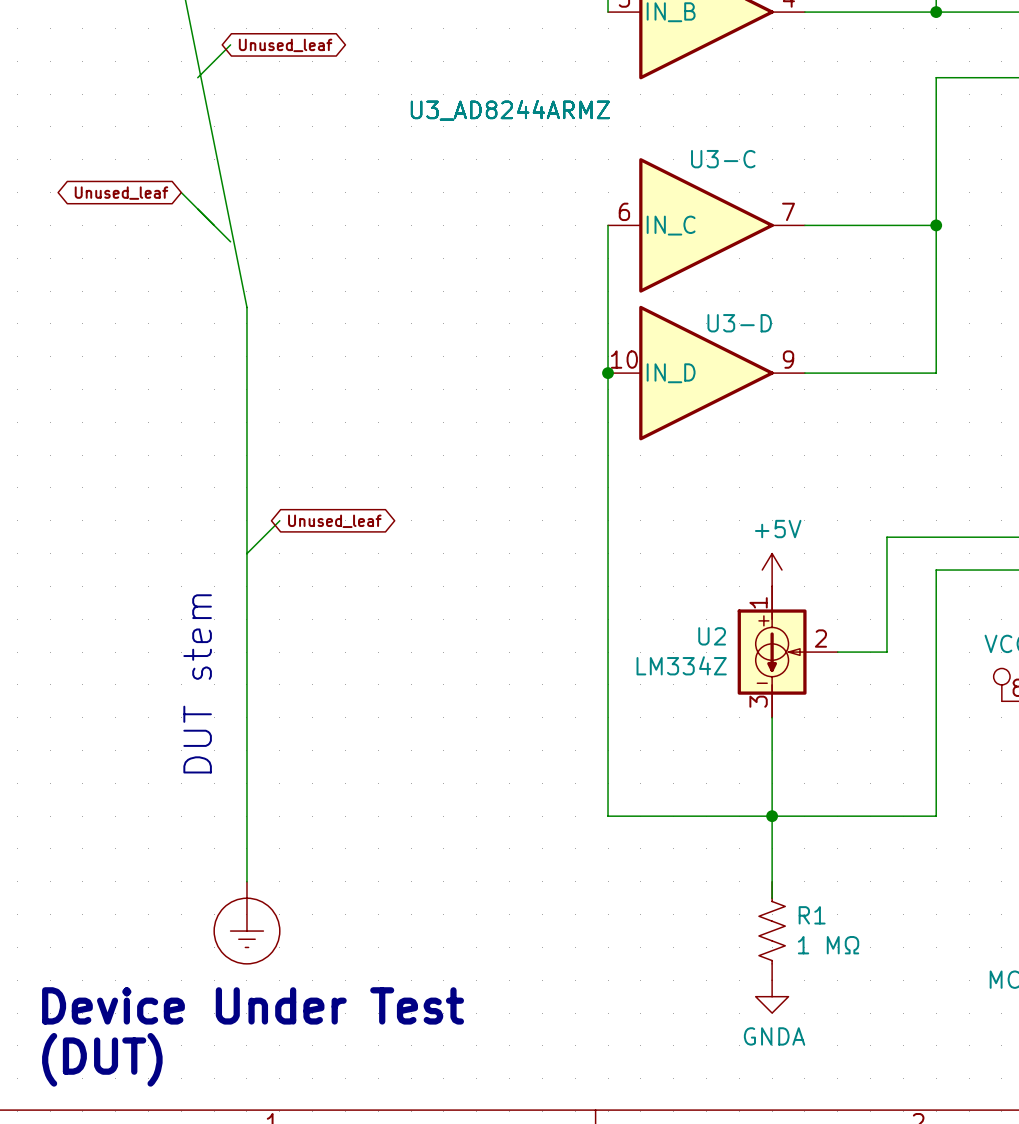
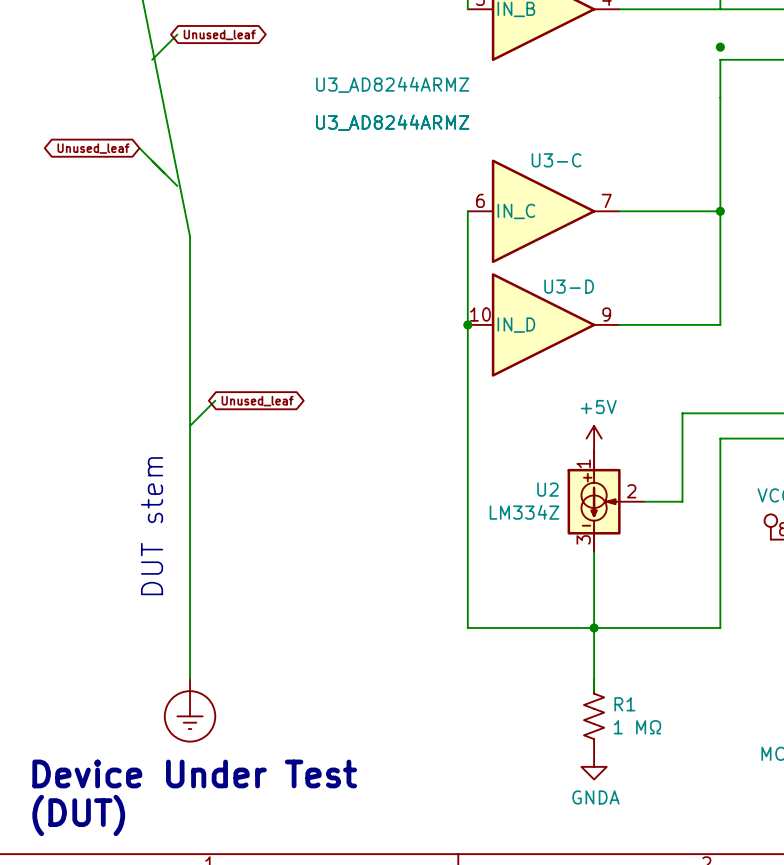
junction position: (936, 12) -> (720, 47)
wire: (608, 225) (608, 274) -> none
U3-C position: (706, 225) -> (543, 211)
wire: (804, 225) (936, 225) -> (619, 211) (720, 211)
junction position: (936, 225) -> (720, 211)
junction position: (608, 373) -> (467, 324)
U3-D position: (706, 373) -> (543, 324)
wire: (804, 373) (936, 373) -> (619, 324) (720, 324) (720, 287)

